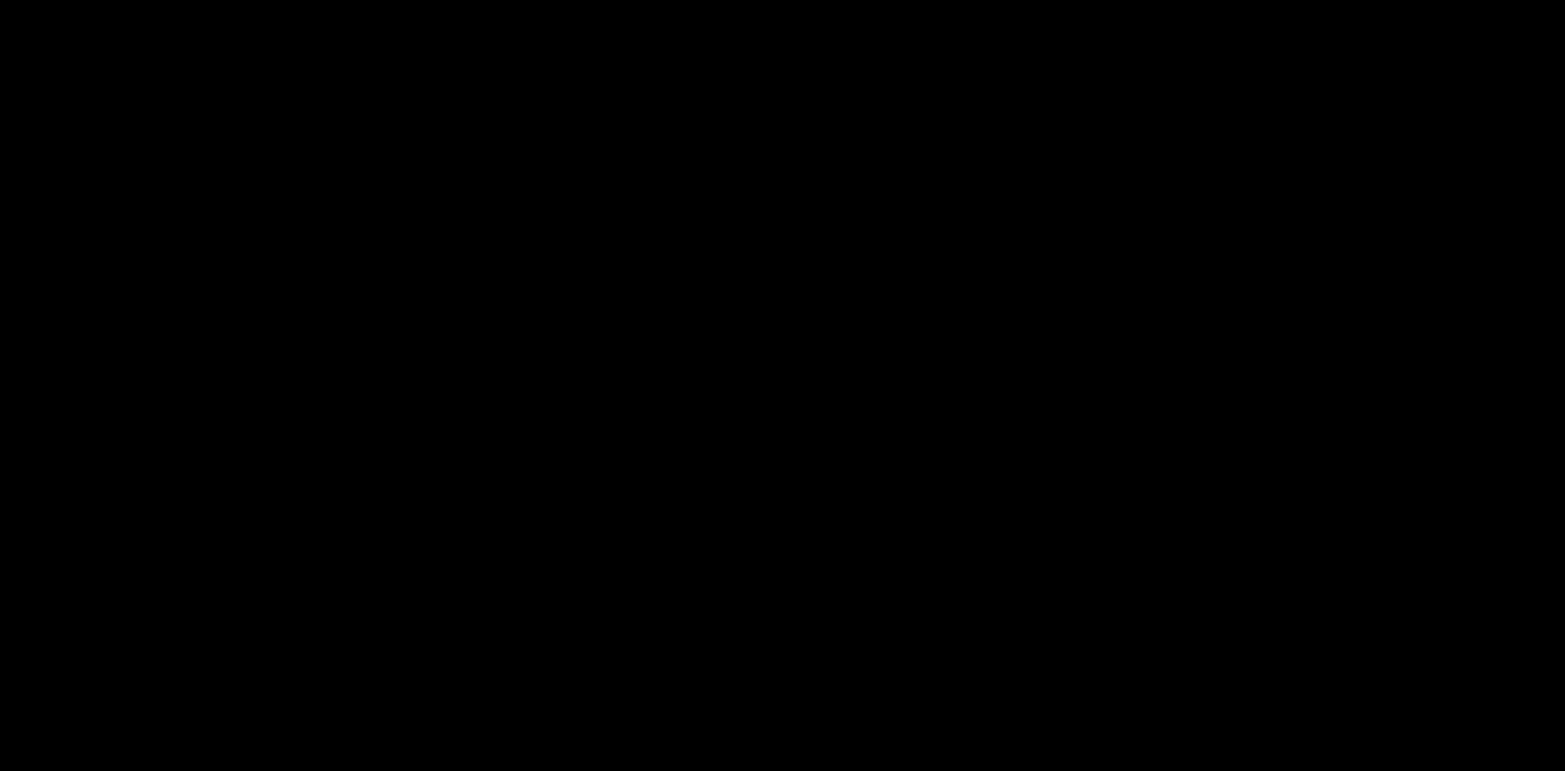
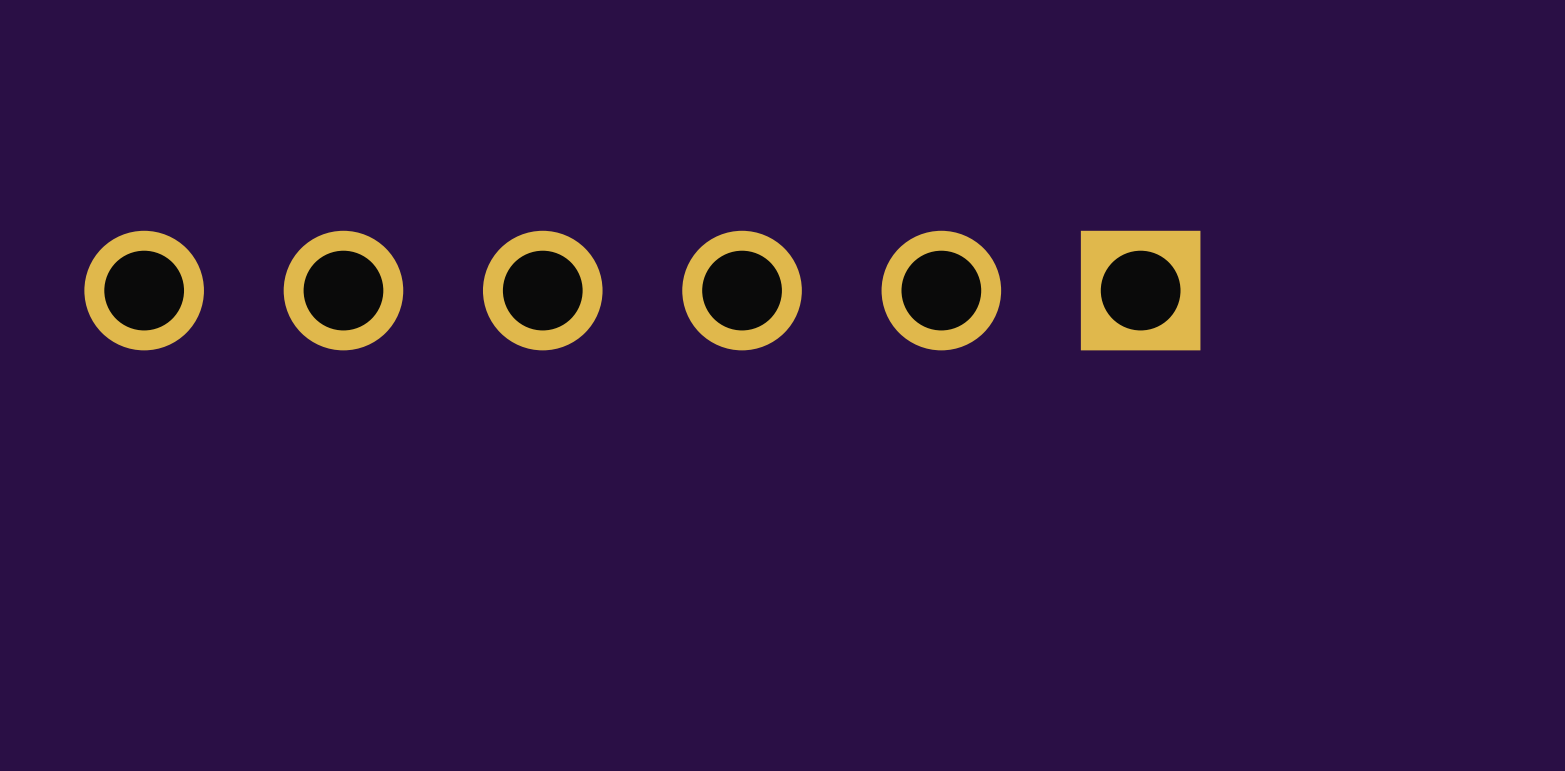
part: none -> (642, 290)

